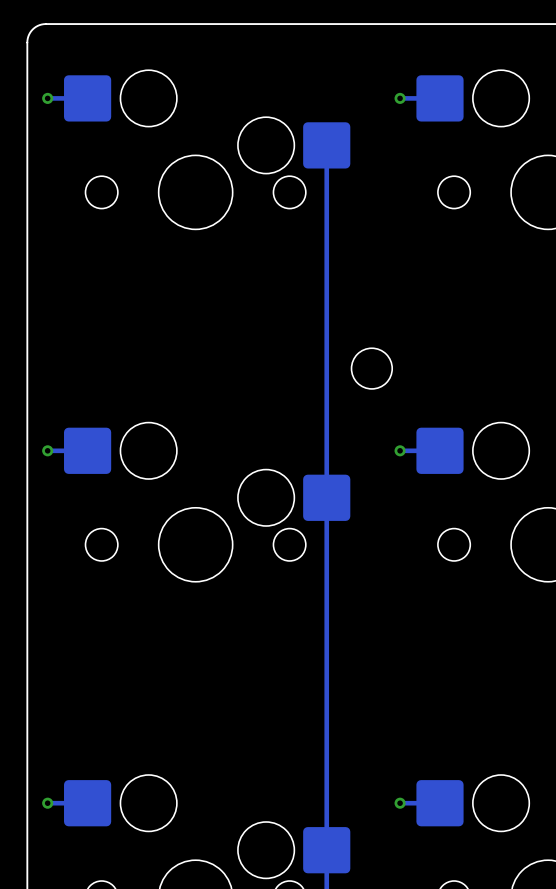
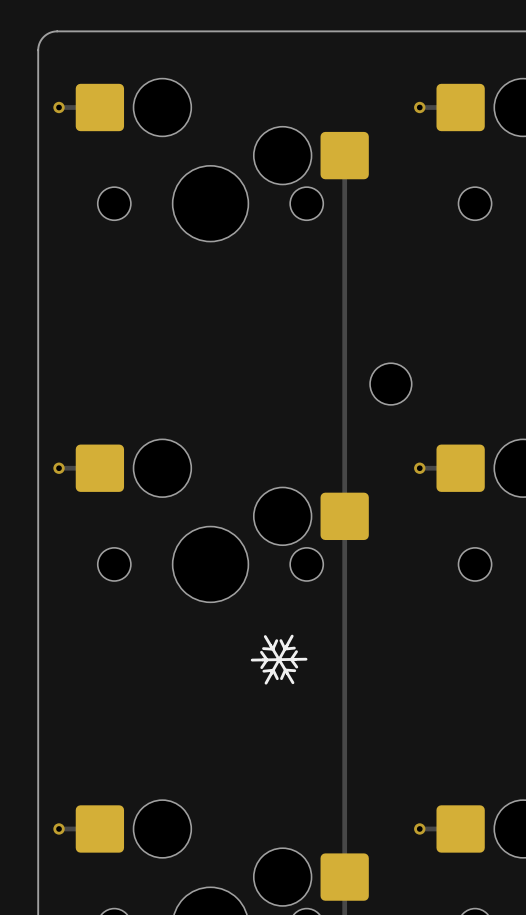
line: none -> (292, 636) (266, 683)
line: none -> (265, 636) (292, 682)
line: none -> (276, 640) (272, 649) (263, 648)
line: none -> (280, 640) (285, 649) (294, 648)
line: none -> (296, 651) (291, 659) (296, 667)
line: none -> (261, 652) (267, 659) (261, 667)
line: none -> (306, 659) (252, 660)
line: none -> (294, 670) (285, 670) (281, 678)
line: none -> (263, 671) (273, 670) (277, 678)

